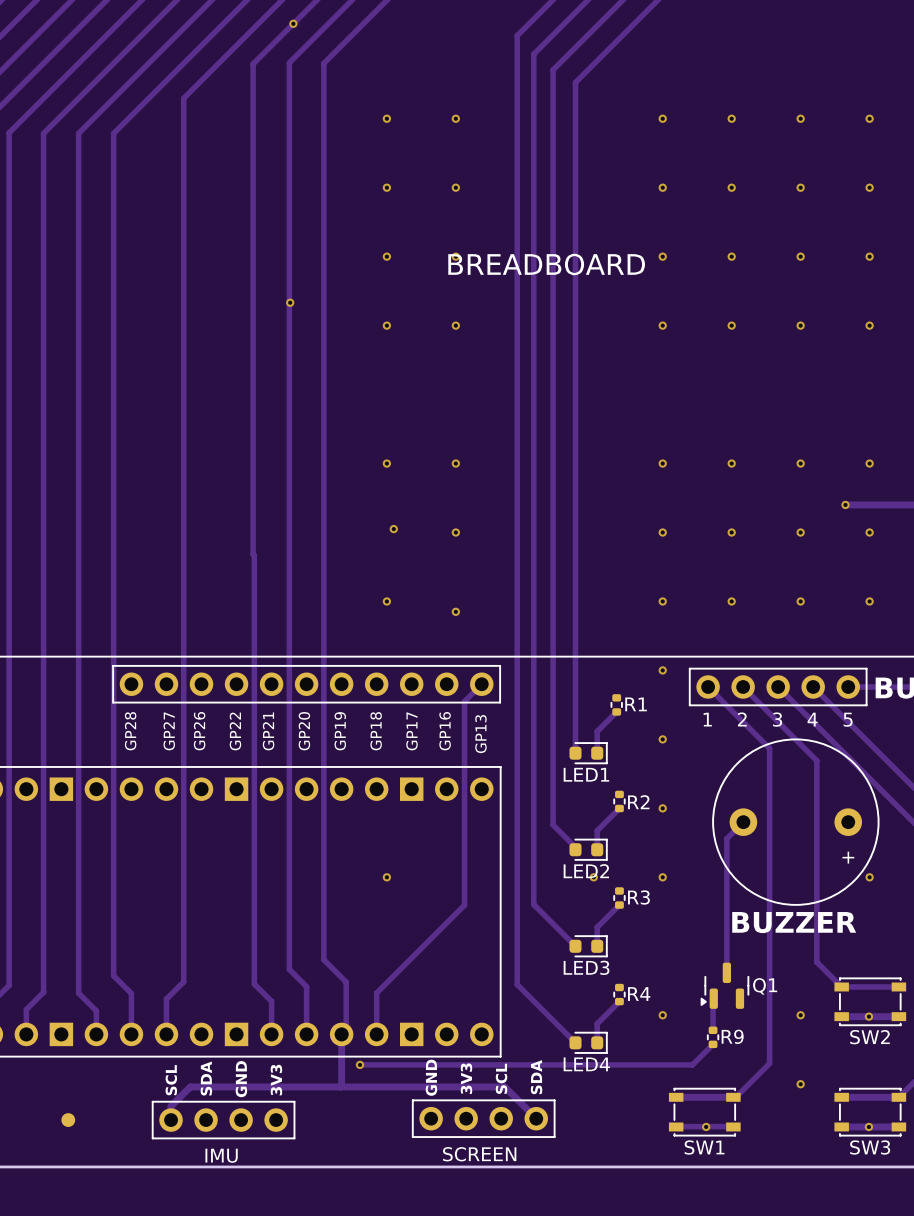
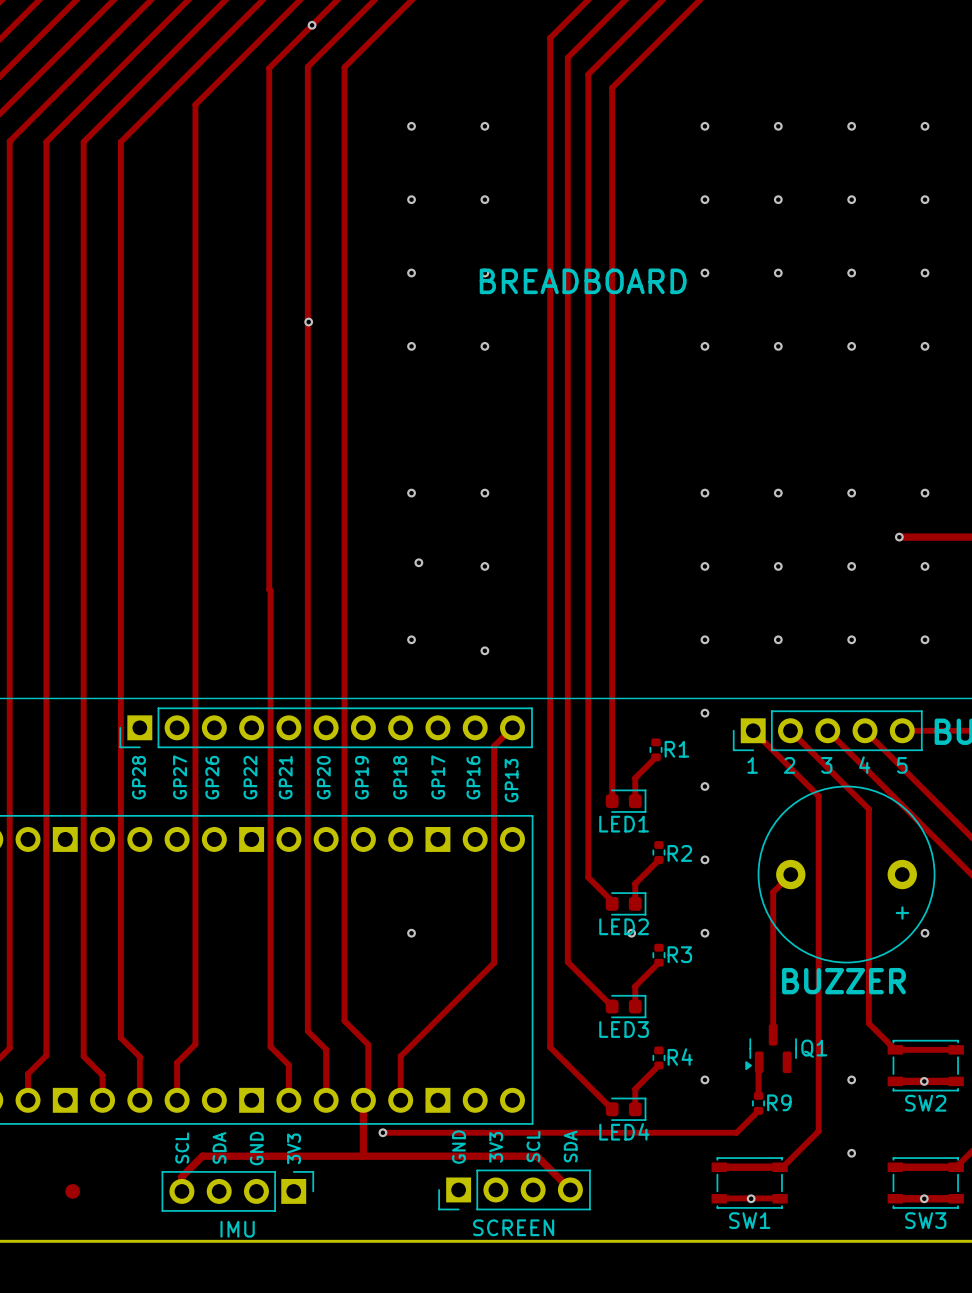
part footprint: [112, 665, 501, 704] -> [119, 707, 533, 749]
part footprint: [688, 667, 868, 707] -> [732, 710, 923, 752]
part footprint: [411, 1099, 556, 1138] -> [438, 1169, 591, 1211]
part footprint: [151, 1100, 296, 1140] -> [161, 1171, 315, 1212]

